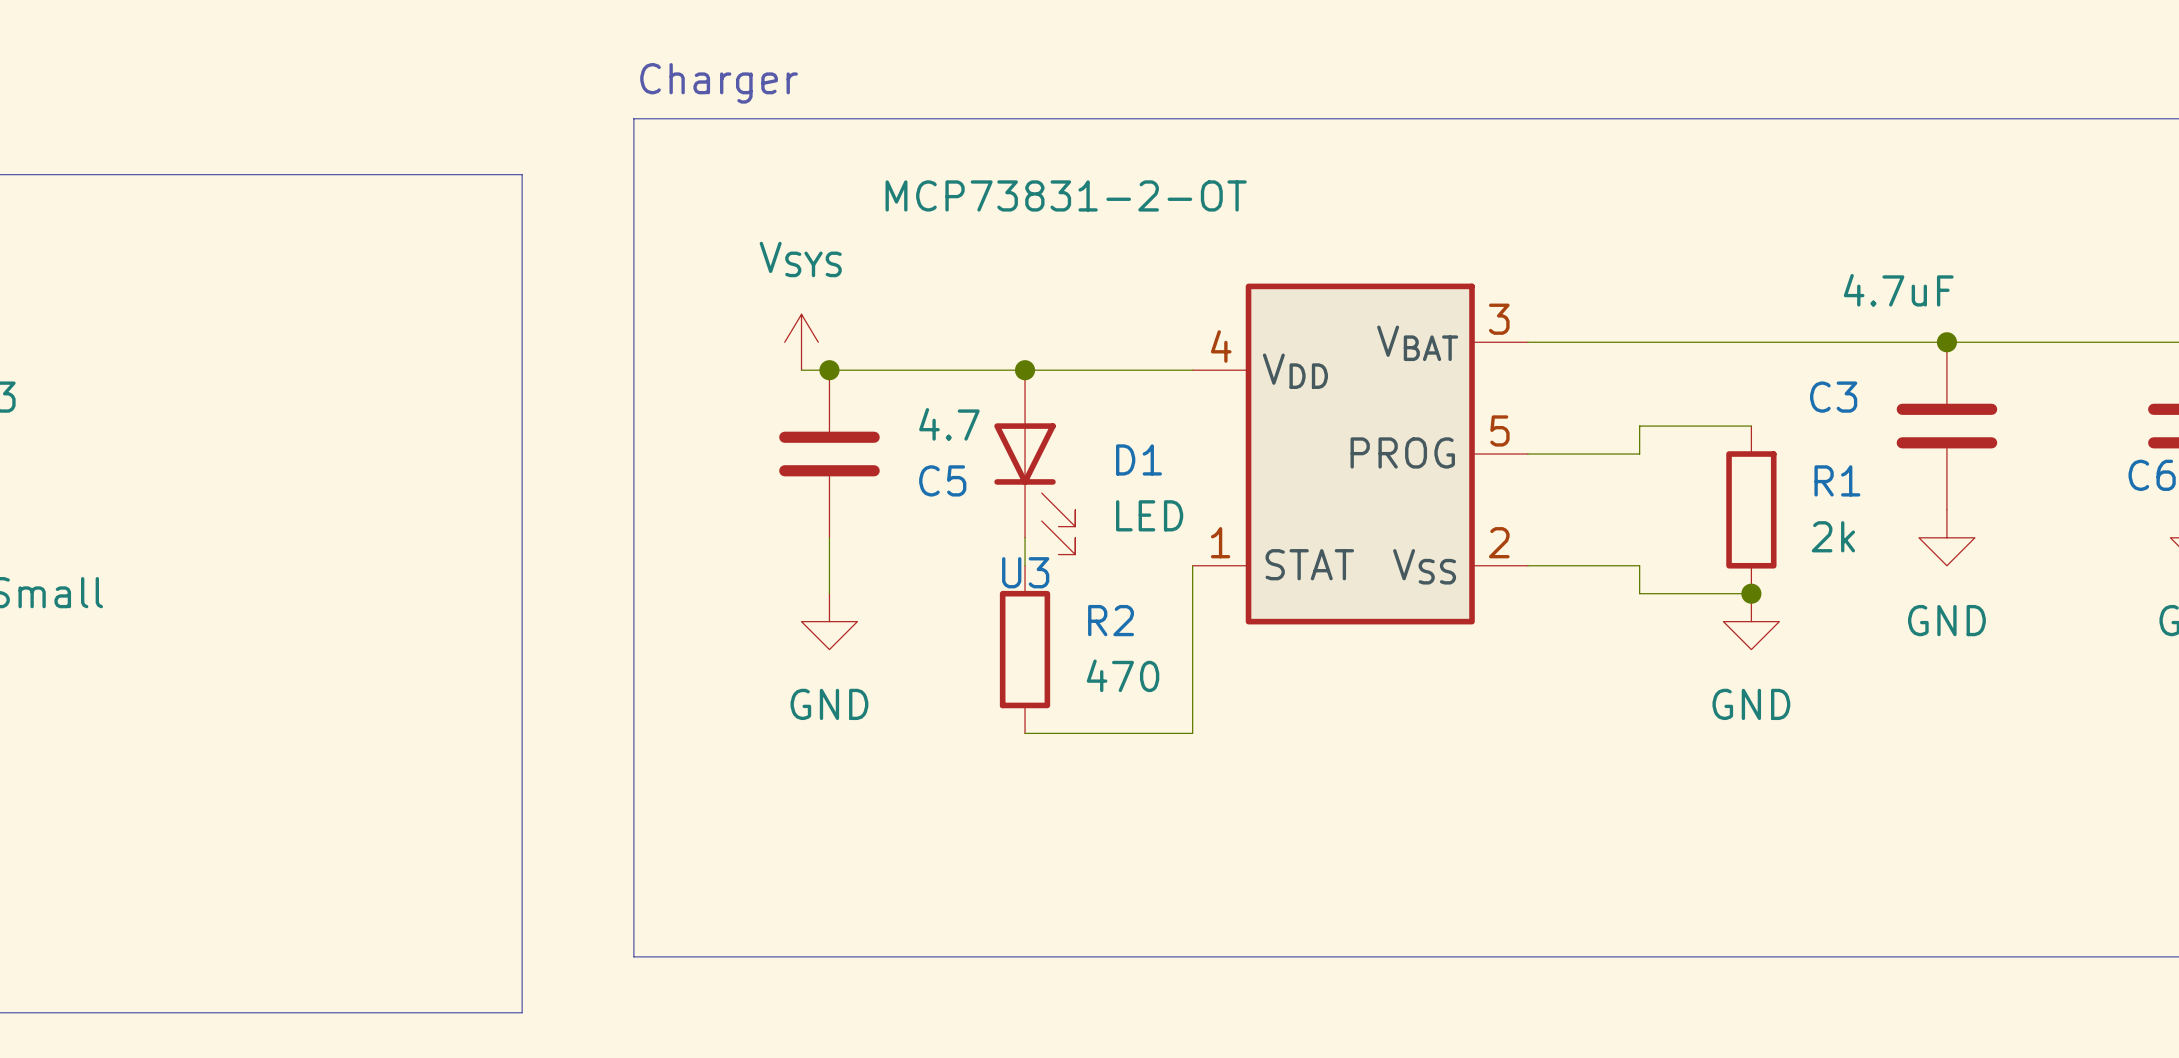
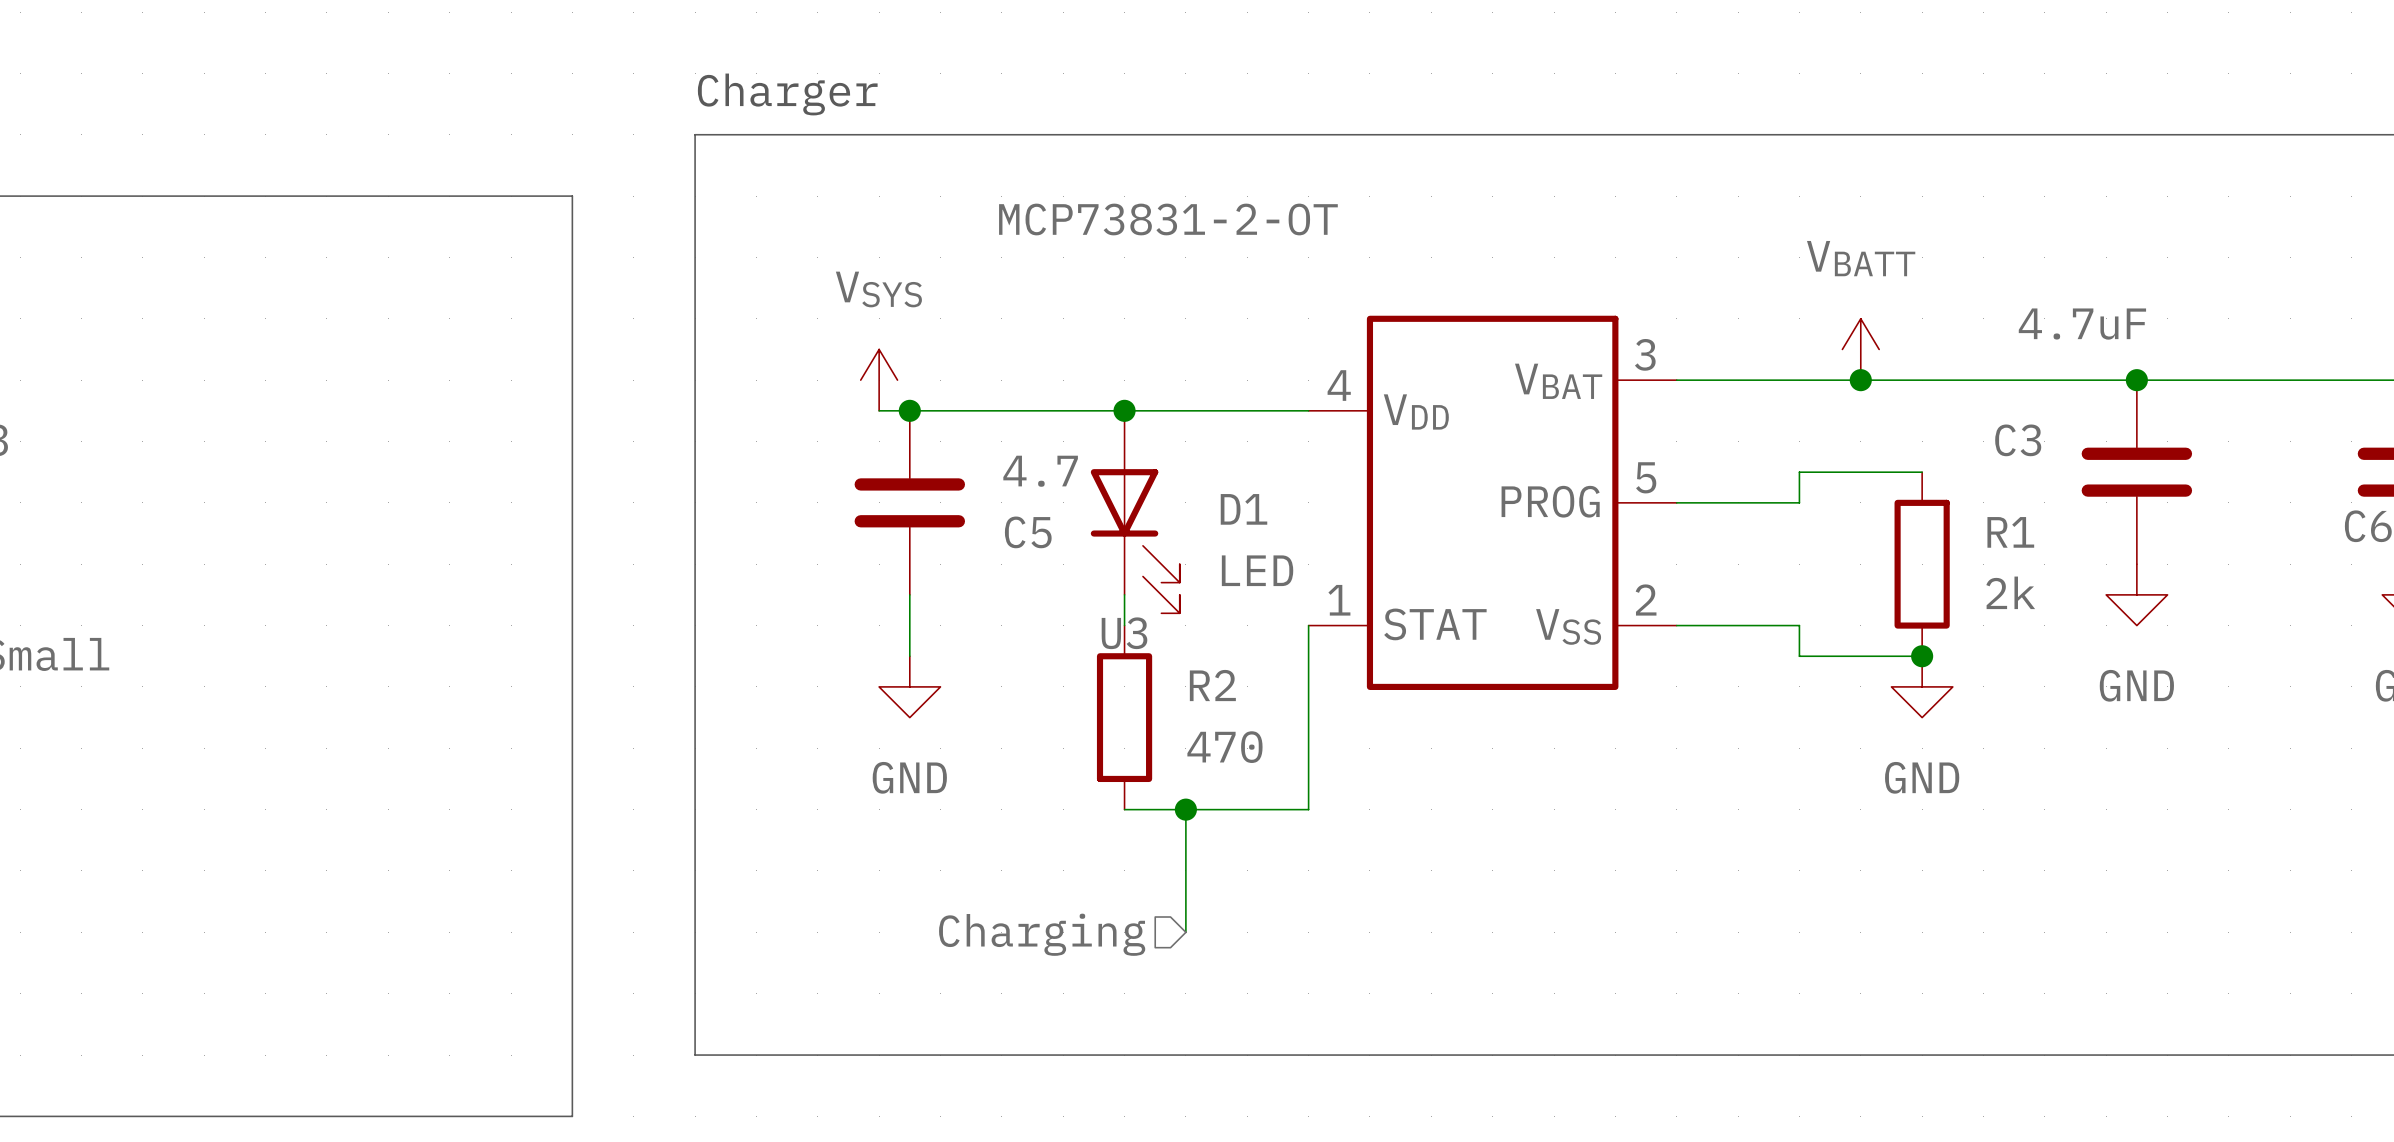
power symbol: none -> VBATT (1860, 349)
junction: none -> (1860, 380)
wire: none -> (1185, 809) (1185, 932)
junction: none -> (1185, 809)
hierarchical label: none -> Charging (1042, 934)

